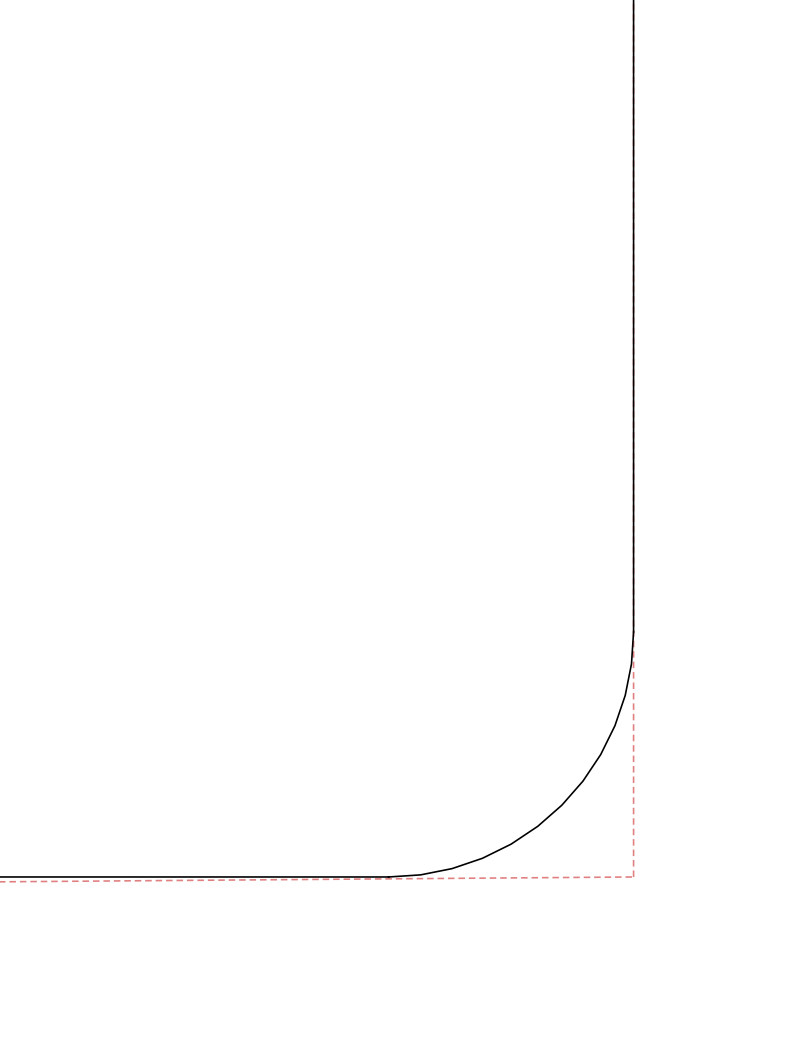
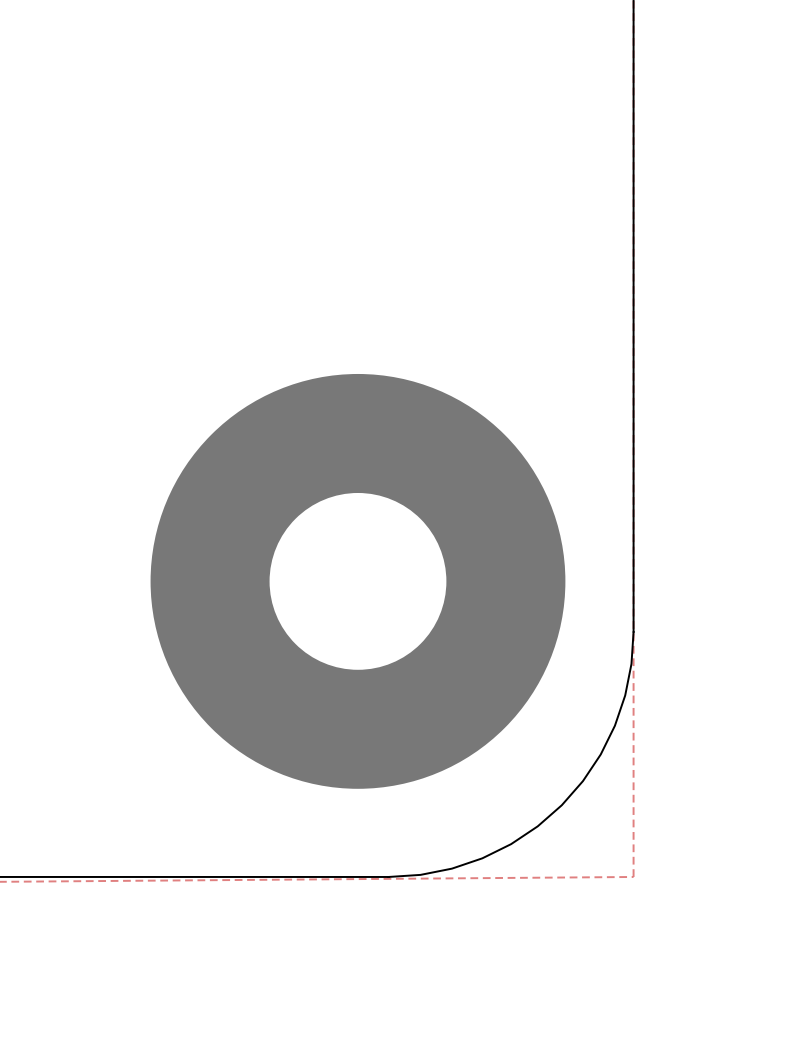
via: none -> (357, 581)

